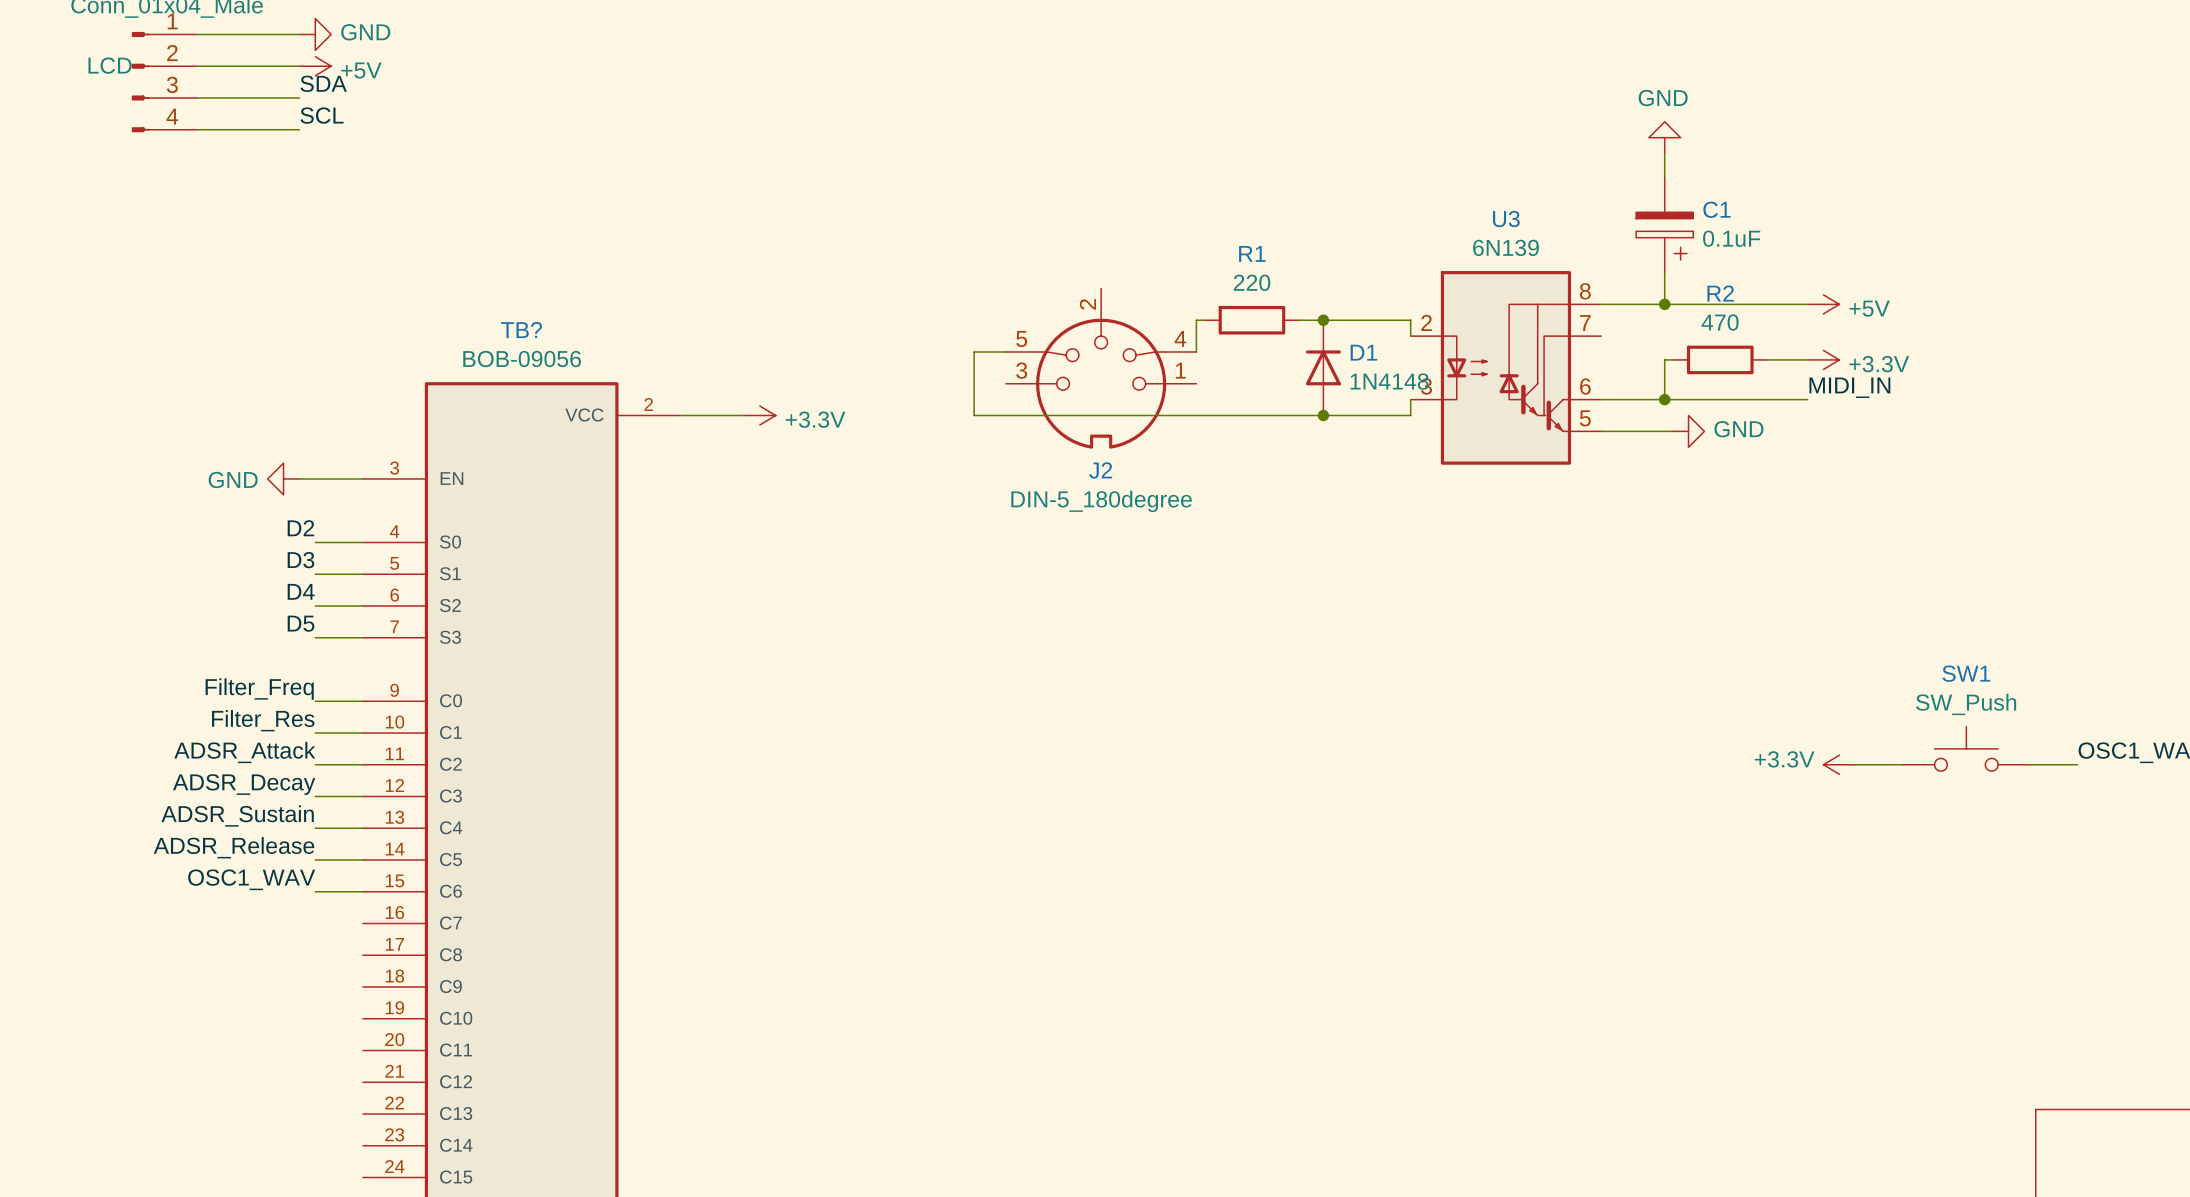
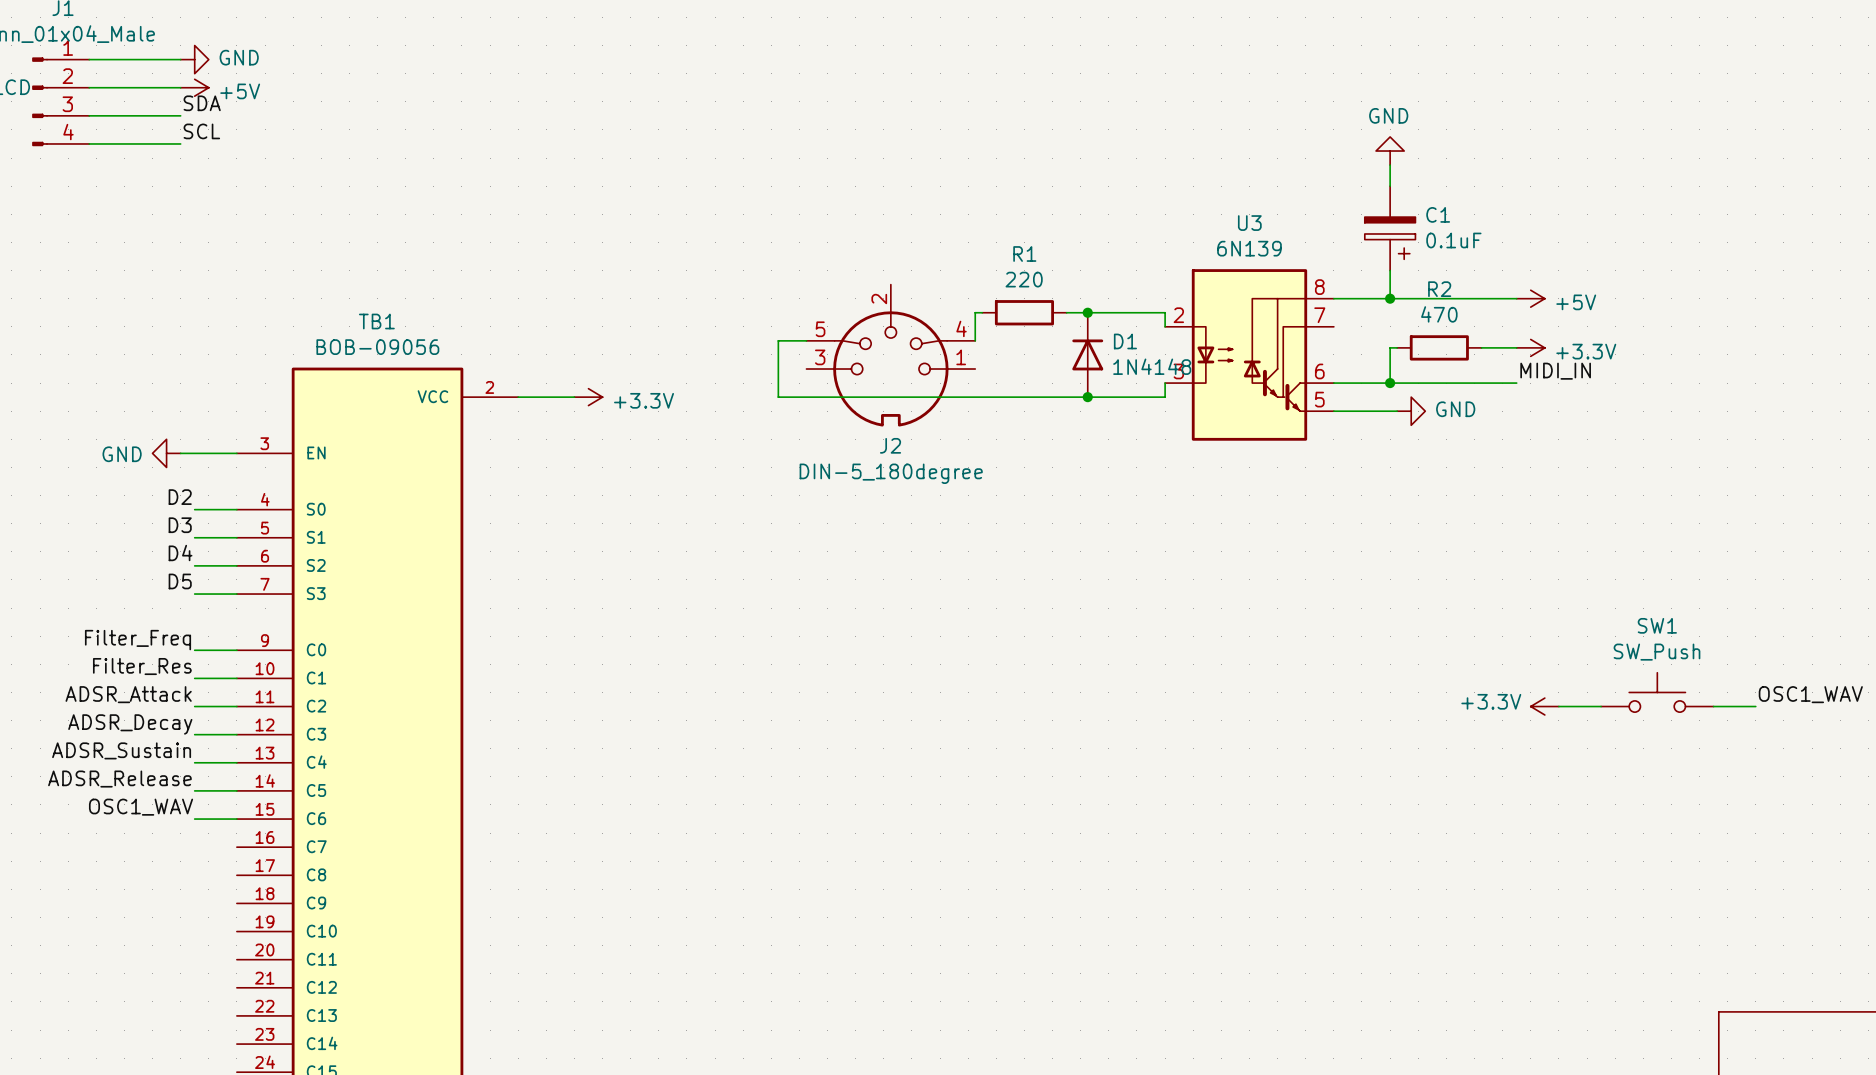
TB? name: TB? (521, 330) -> TB1 (376, 321)

